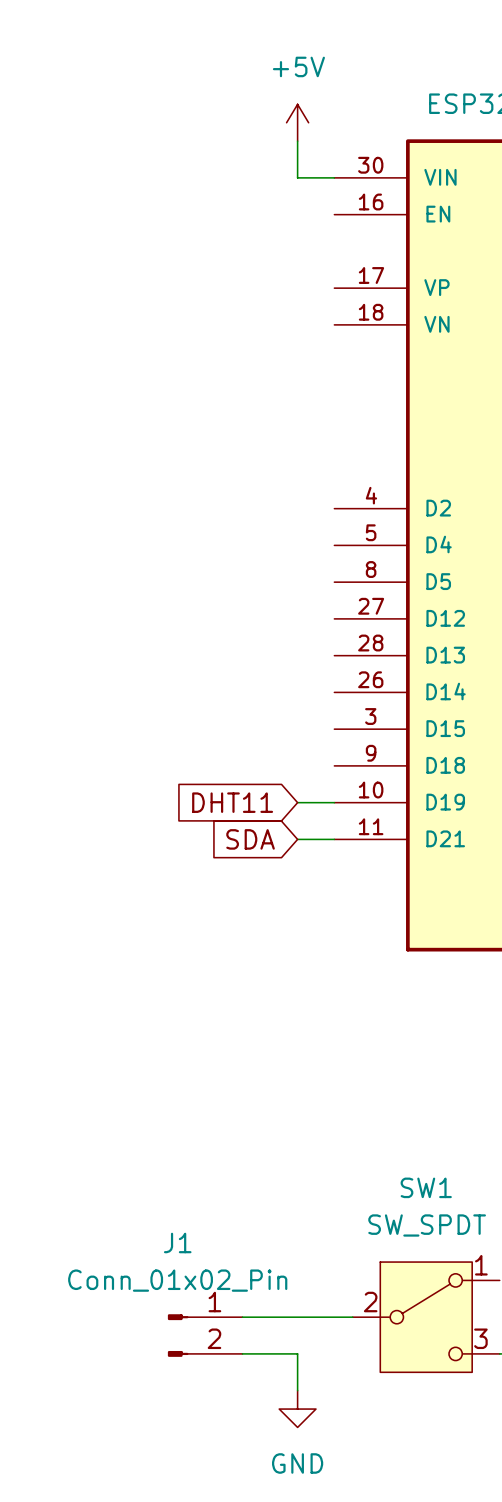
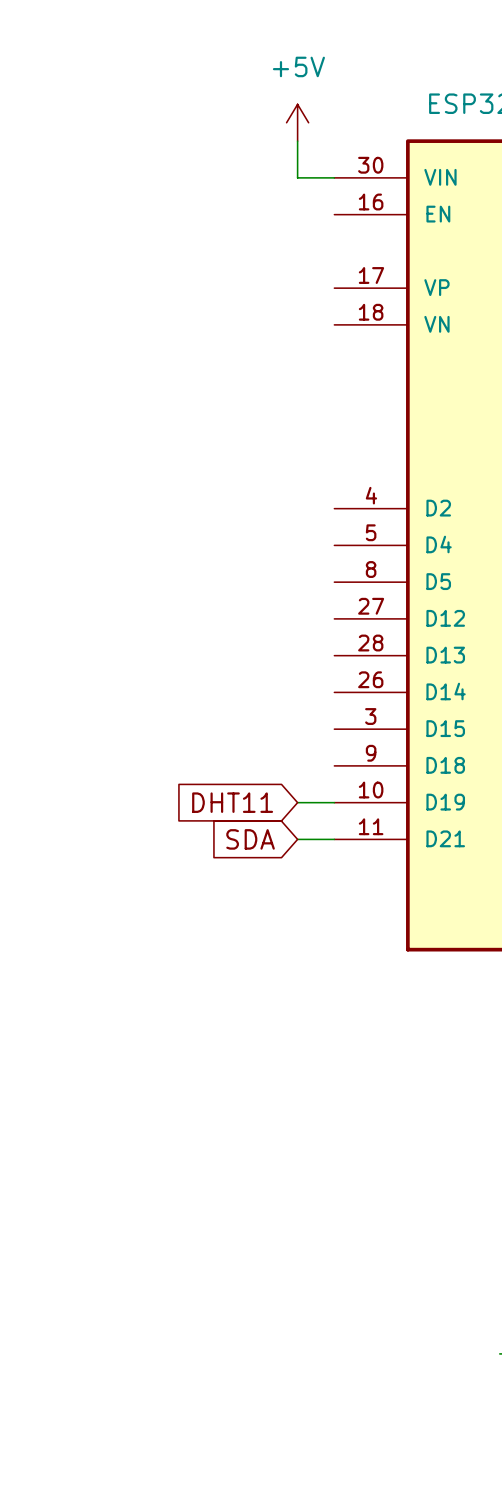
wire: (242, 1317) (352, 1317) -> none
SW1: SW_SPDT (426, 1317) -> none
J1: Conn_01x02_Pin (205, 1335) -> none
wire: (242, 1353) (297, 1353) (297, 1390) -> none
power symbol: GND (297, 1409) -> none

